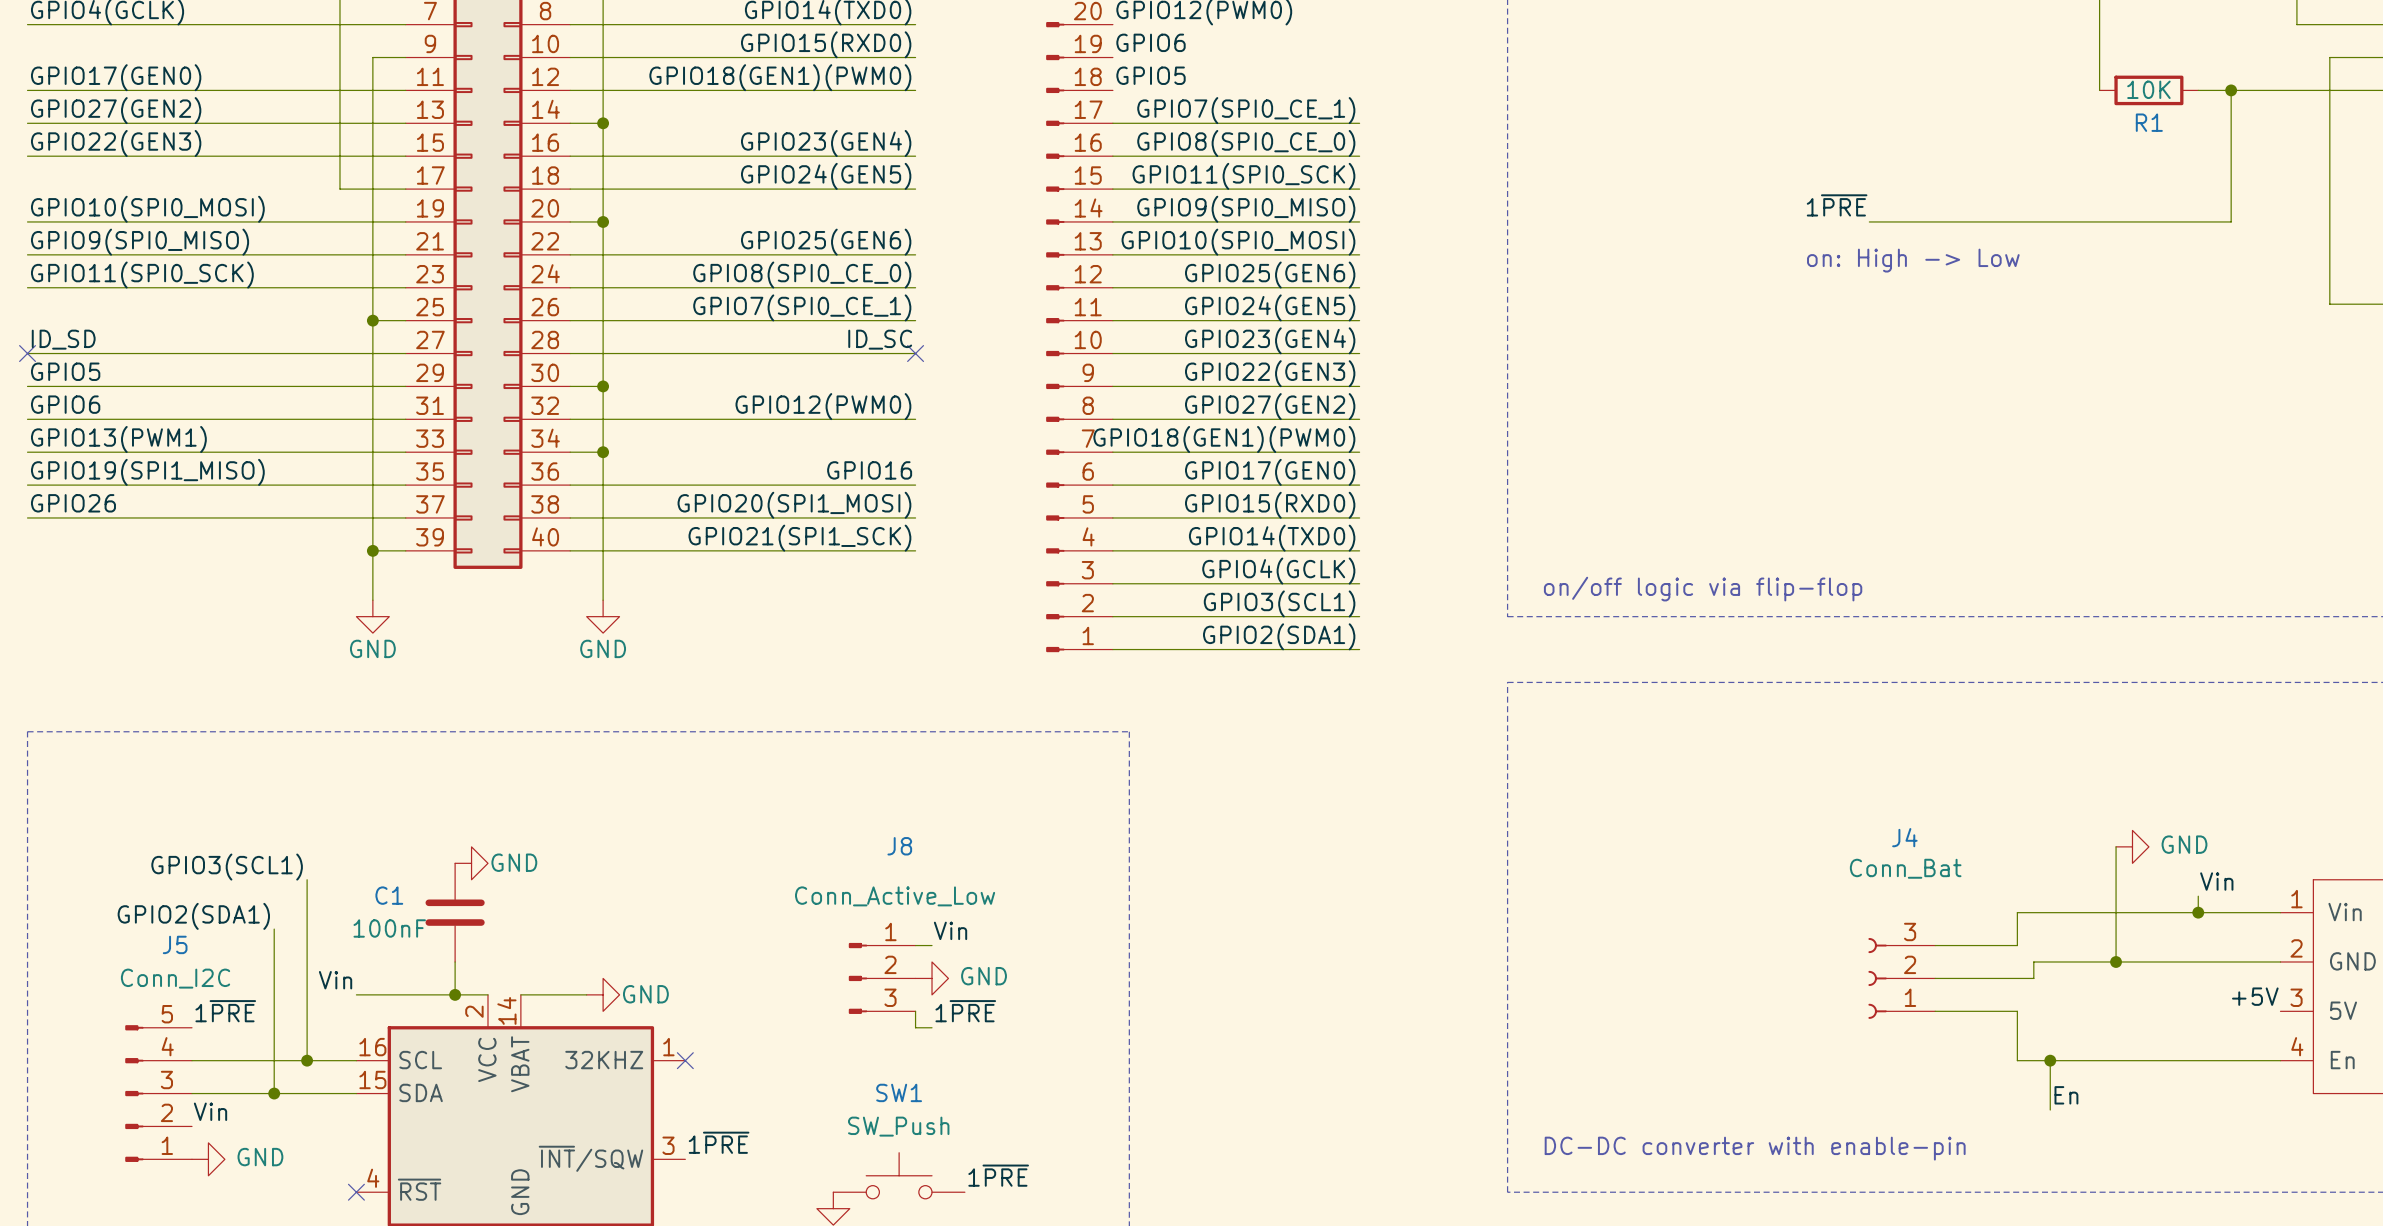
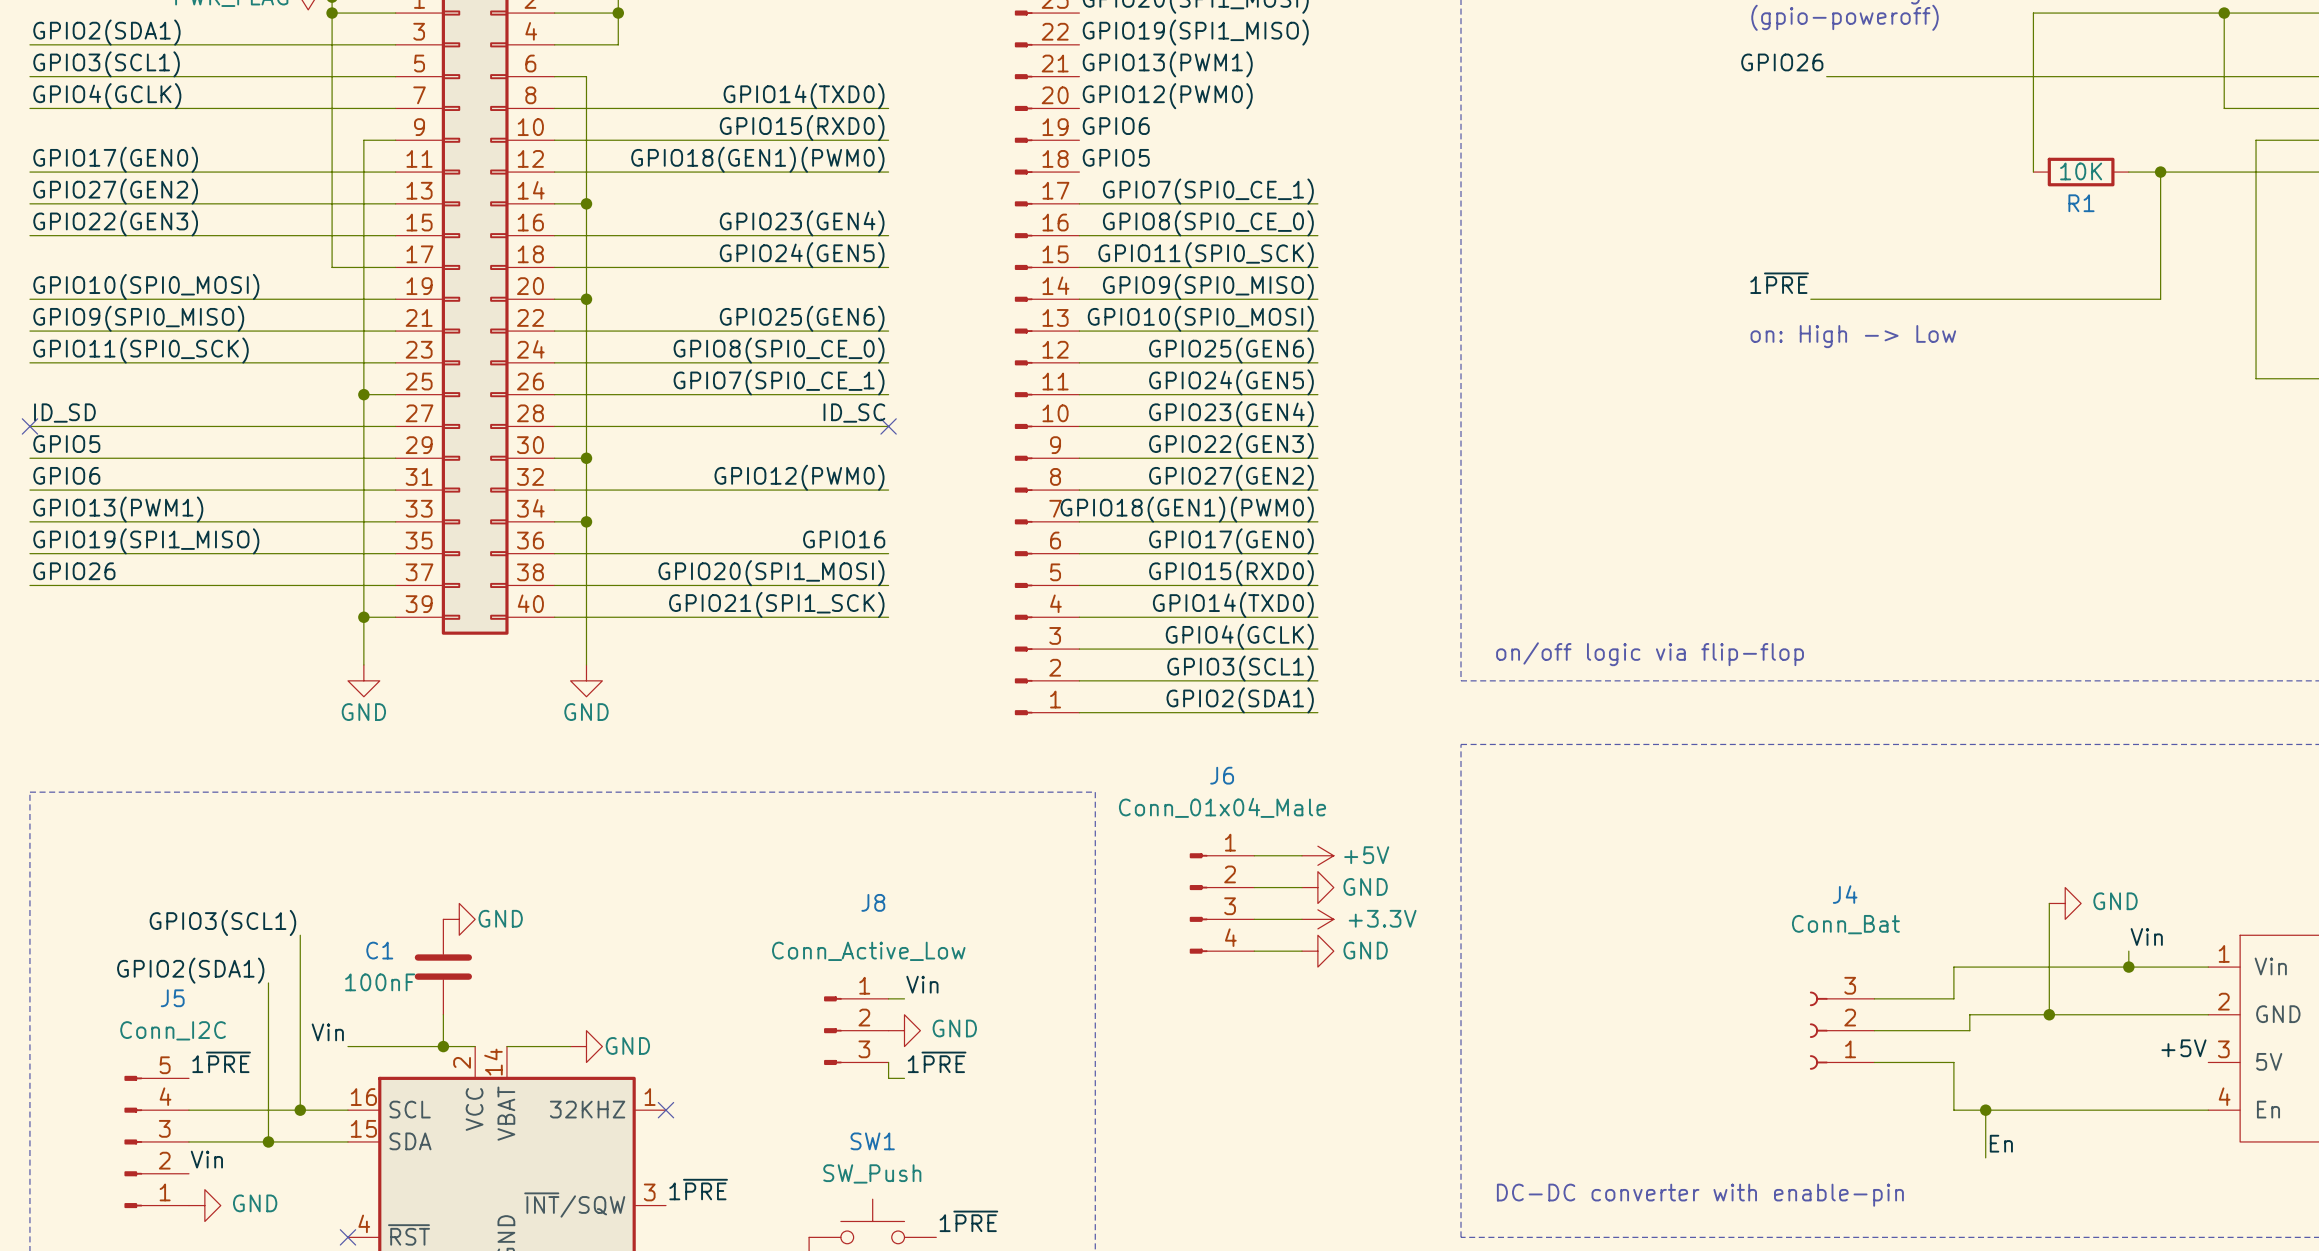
wire: none -> (1254, 855) (1302, 855)
power symbol: none -> +5V (1317, 855)
wire: none -> (1254, 887) (1302, 887)
power symbol: none -> GND (1317, 887)
J6: none -> Conn_01x04_Male (1222, 903)
wire: none -> (1254, 919) (1302, 919)
power symbol: none -> +3.3V (1317, 919)
wire: none -> (1254, 951) (1302, 951)
power symbol: none -> GND (1317, 951)

